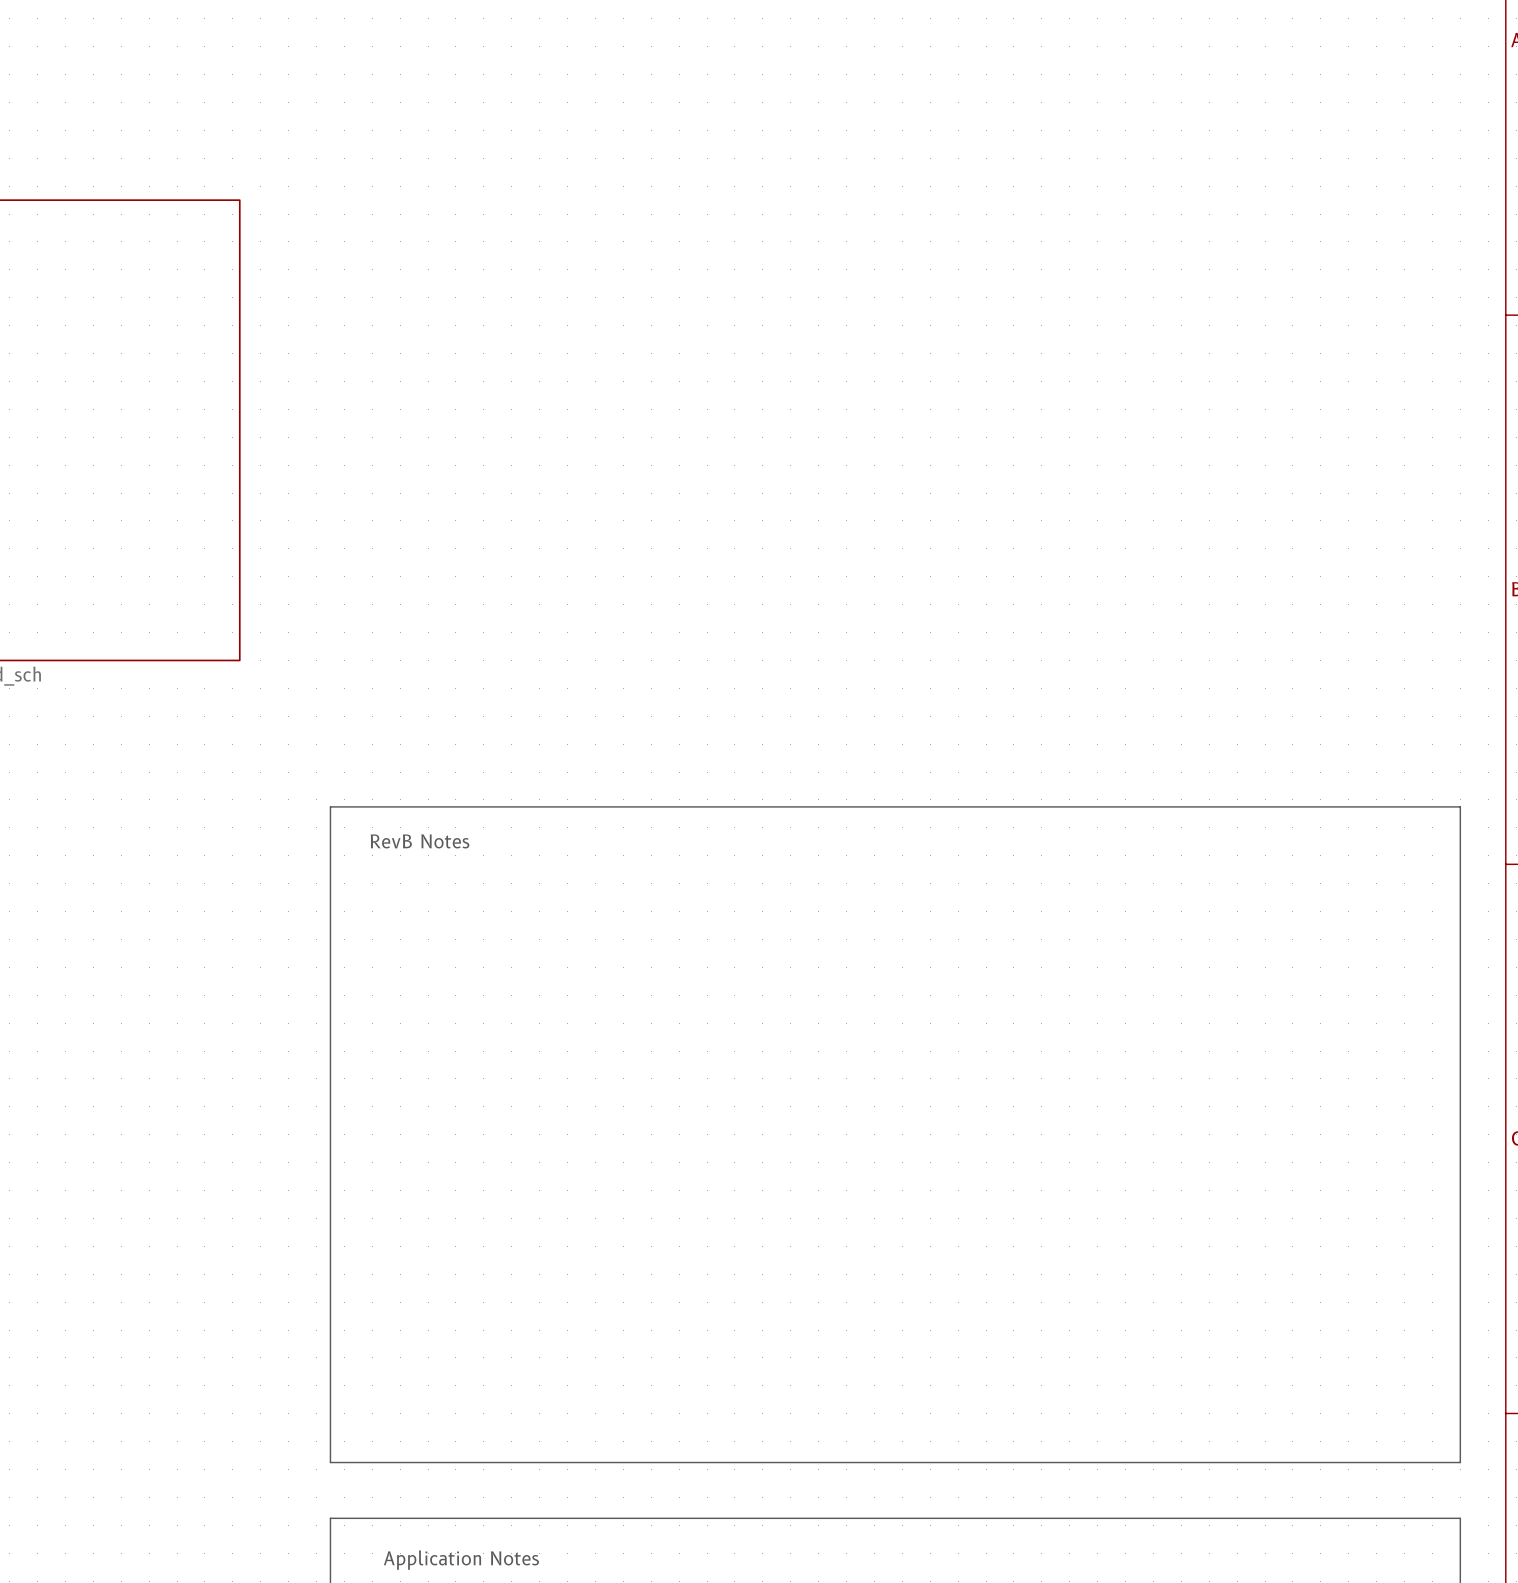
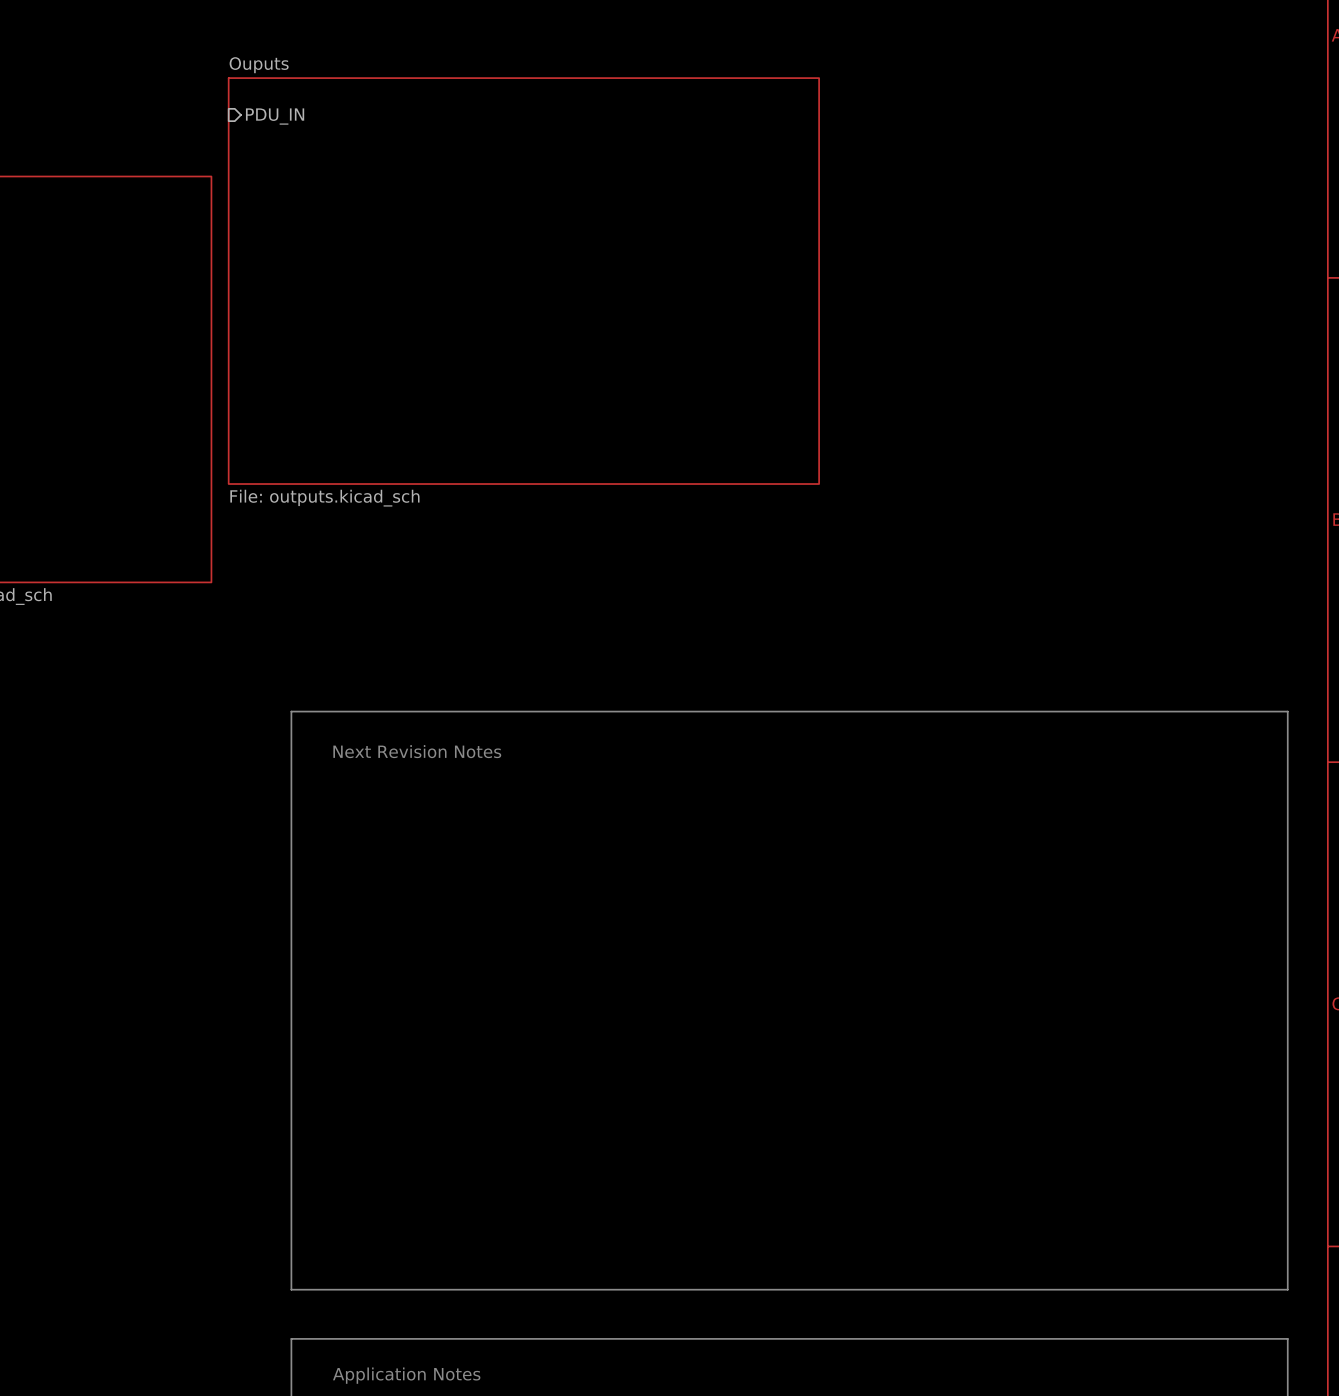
sheet pin: none -> PDU_IN (275, 116)
sheet Ouputs: none -> File: outputs.kicad_sch (523, 281)
text: RevB Notes (420, 841) -> Next Revision Notes (417, 751)

